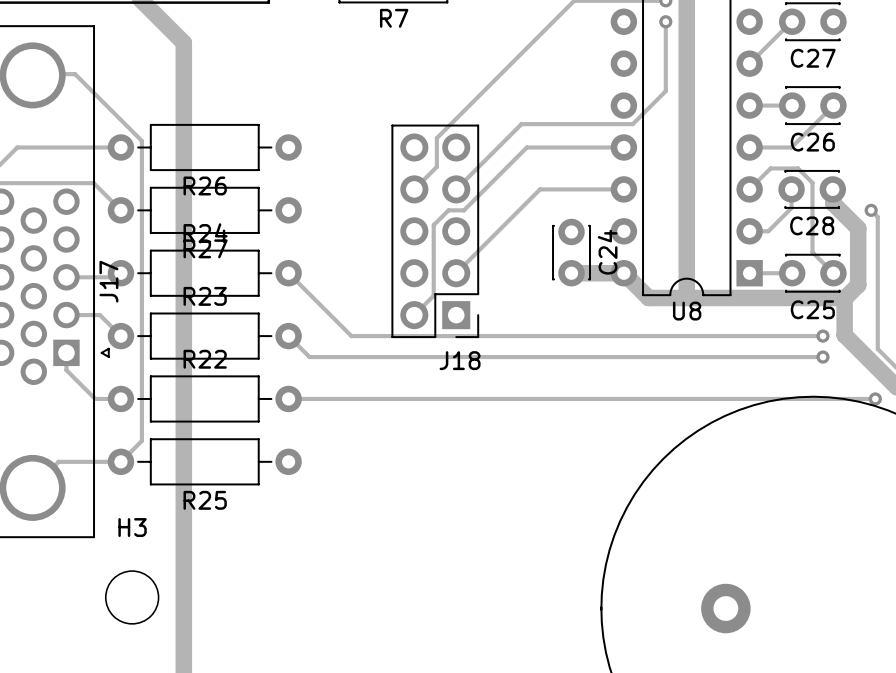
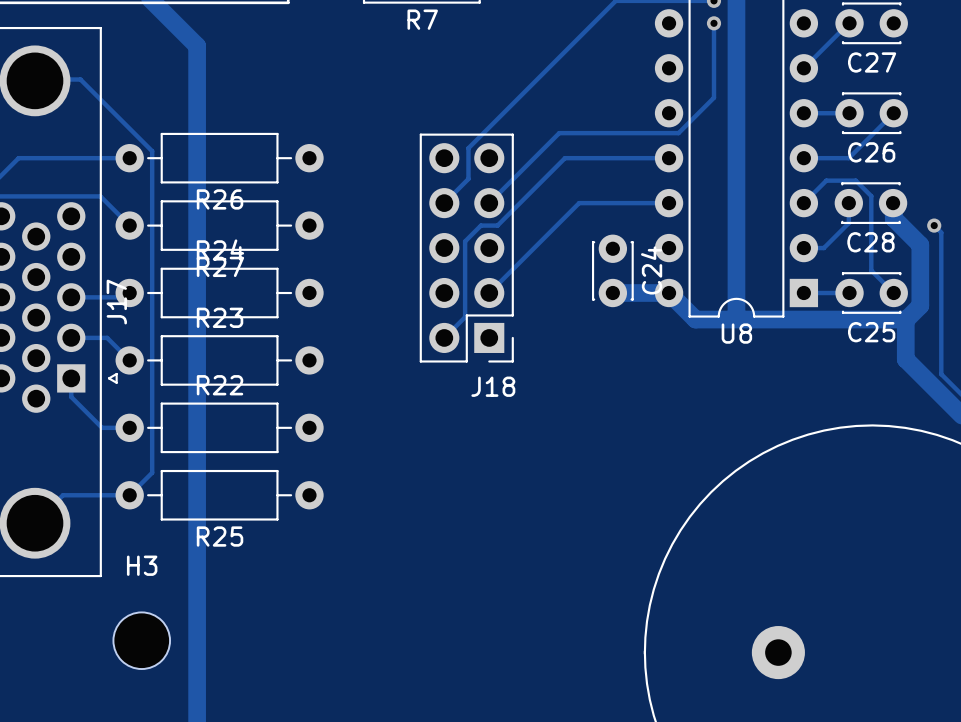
track: (288, 273) (351, 336) (822, 336) -> none
track: (288, 336) (309, 357) (822, 357) -> none
via: (822, 336) -> none
via: (822, 357) -> none
track: (288, 398) (875, 398) -> none
via: (875, 398) -> none

